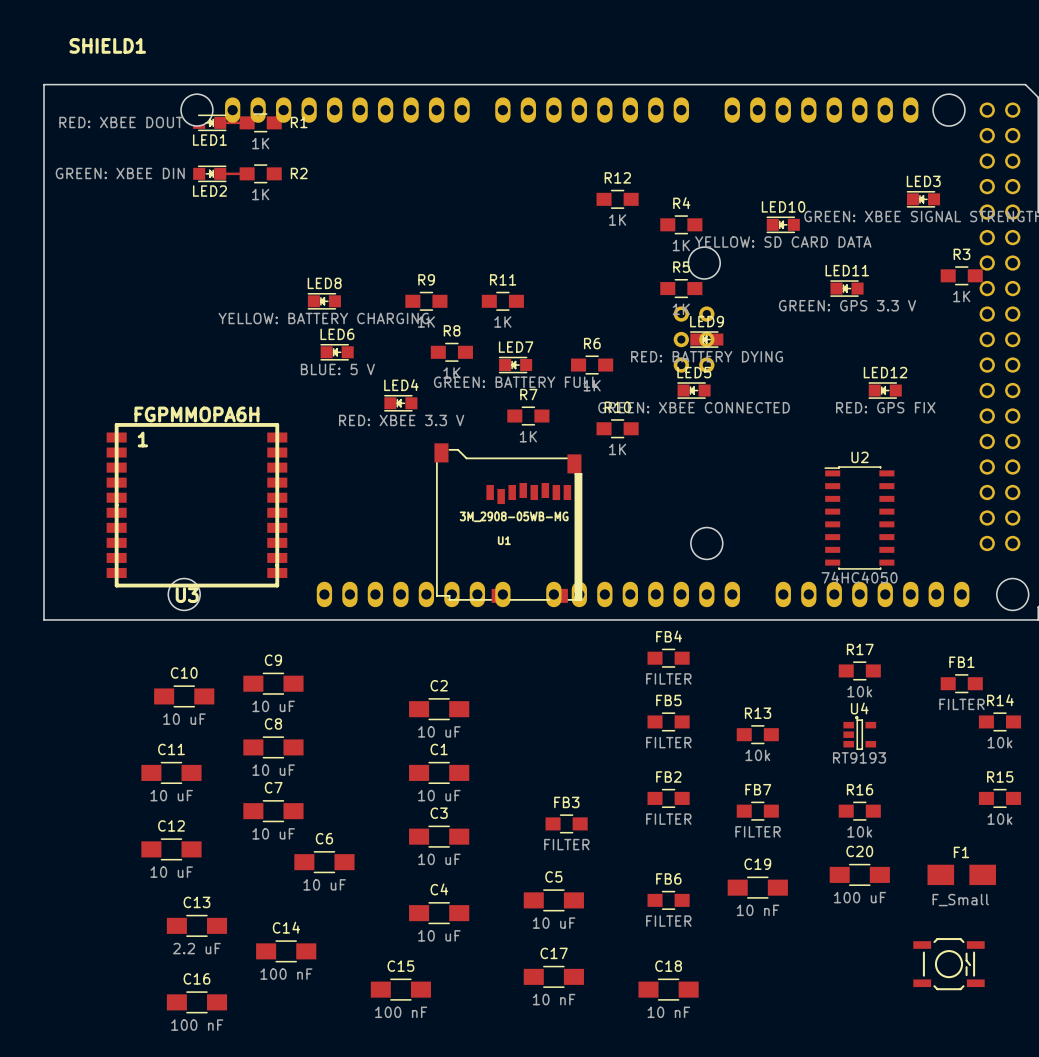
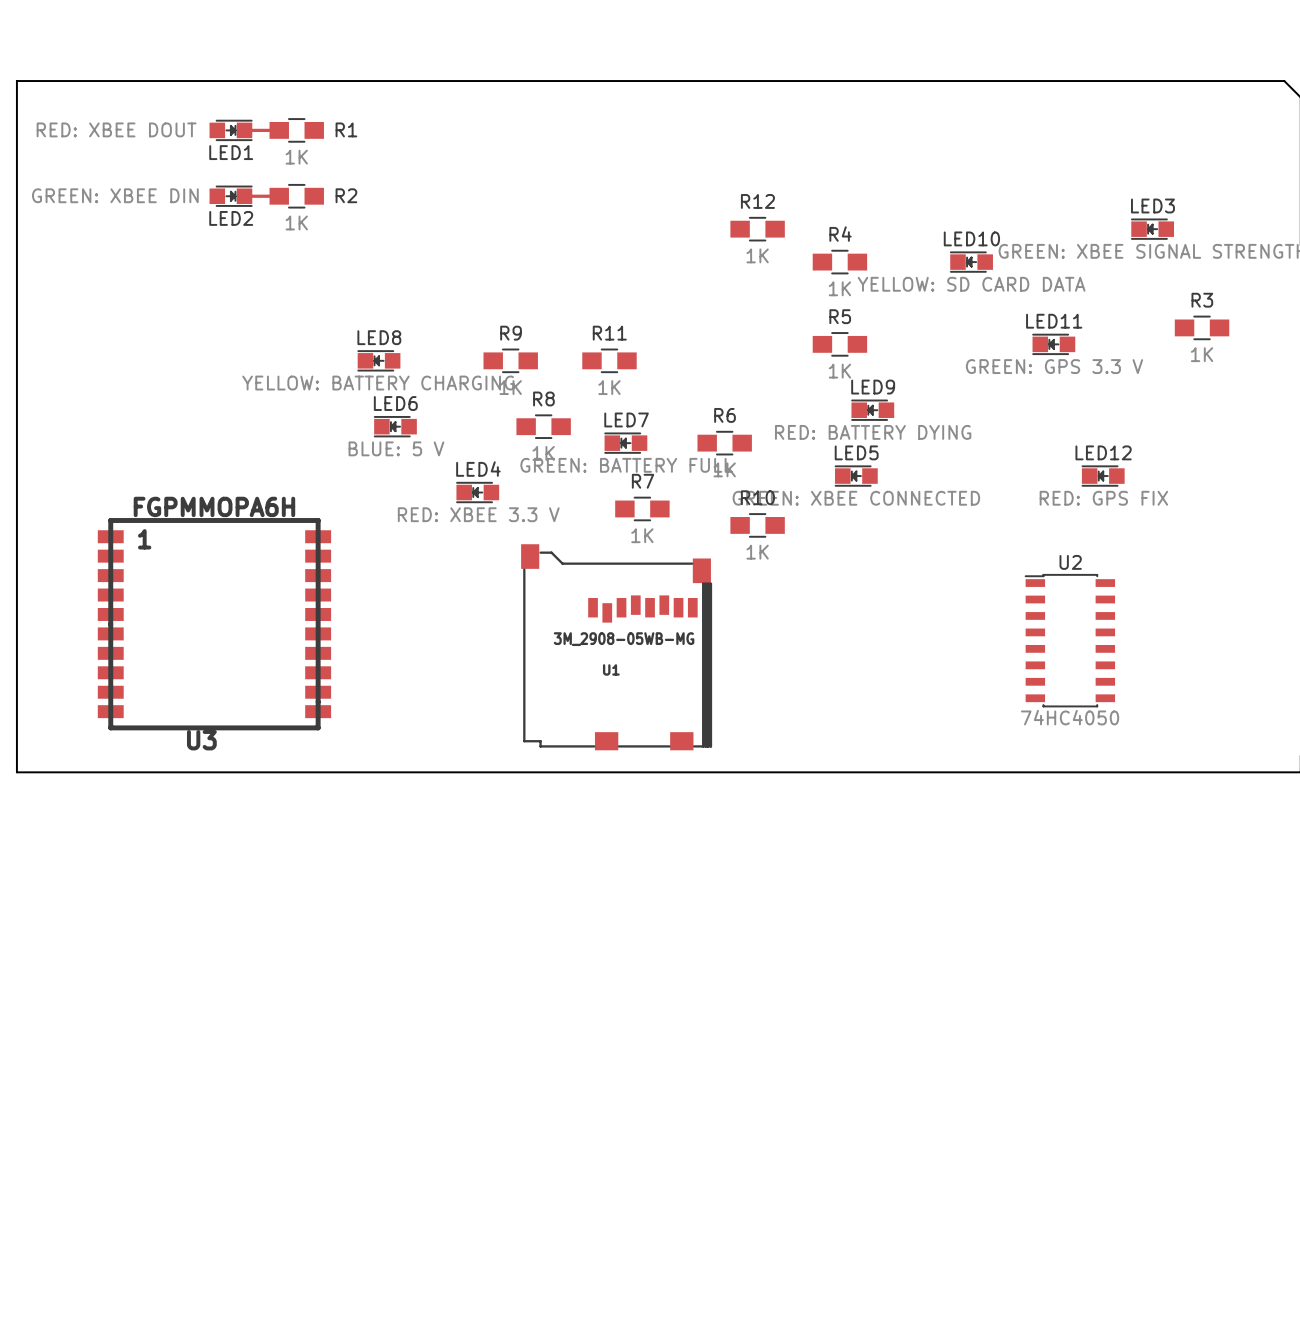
SHIELD1: (598, 352) -> none
FB4: FILTER (668, 658) -> none
R17: 10k (859, 670) -> none
C9: 10 uF (273, 683) -> none
FB1: FILTER (961, 683) -> none
C10: 10 uF (184, 696) -> none
C2: 10 uF (439, 709) -> none
FB5: FILTER (668, 721) -> none
R14: 10k (999, 721) -> none
U4: RT9193 (859, 732) -> none
R13: 10k (757, 734) -> none
C8: 10 uF (273, 747) -> none
C11: 10 uF (171, 772) -> none
C1: 10 uF (439, 772) -> none
FB2: FILTER (668, 798) -> none
R15: 10k (999, 798) -> none
C7: 10 uF (273, 811) -> none
FB7: FILTER (757, 811) -> none
R16: 10k (859, 811) -> none
FB3: FILTER (566, 823) -> none
C3: 10 uF (439, 836) -> none
C12: 10 uF (171, 849) -> none
C6: 10 uF (324, 862) -> none
C20: 100 uF (859, 874) -> none
F1: F_Small (961, 874) -> none
C19: 10 nF (757, 887) -> none
C5: 10 uF (553, 900) -> none
FB6: FILTER (668, 900) -> none
C4: 10 uF (439, 913) -> none
C13: 2.2 uF (196, 925) -> none
C14: 100 nF (286, 951) -> none
part: (949, 964) -> none
C17: 10 nF (553, 976) -> none
C15: 100 nF (400, 989) -> none
C18: 10 nF (668, 989) -> none
C16: 100 nF (196, 1002) -> none

